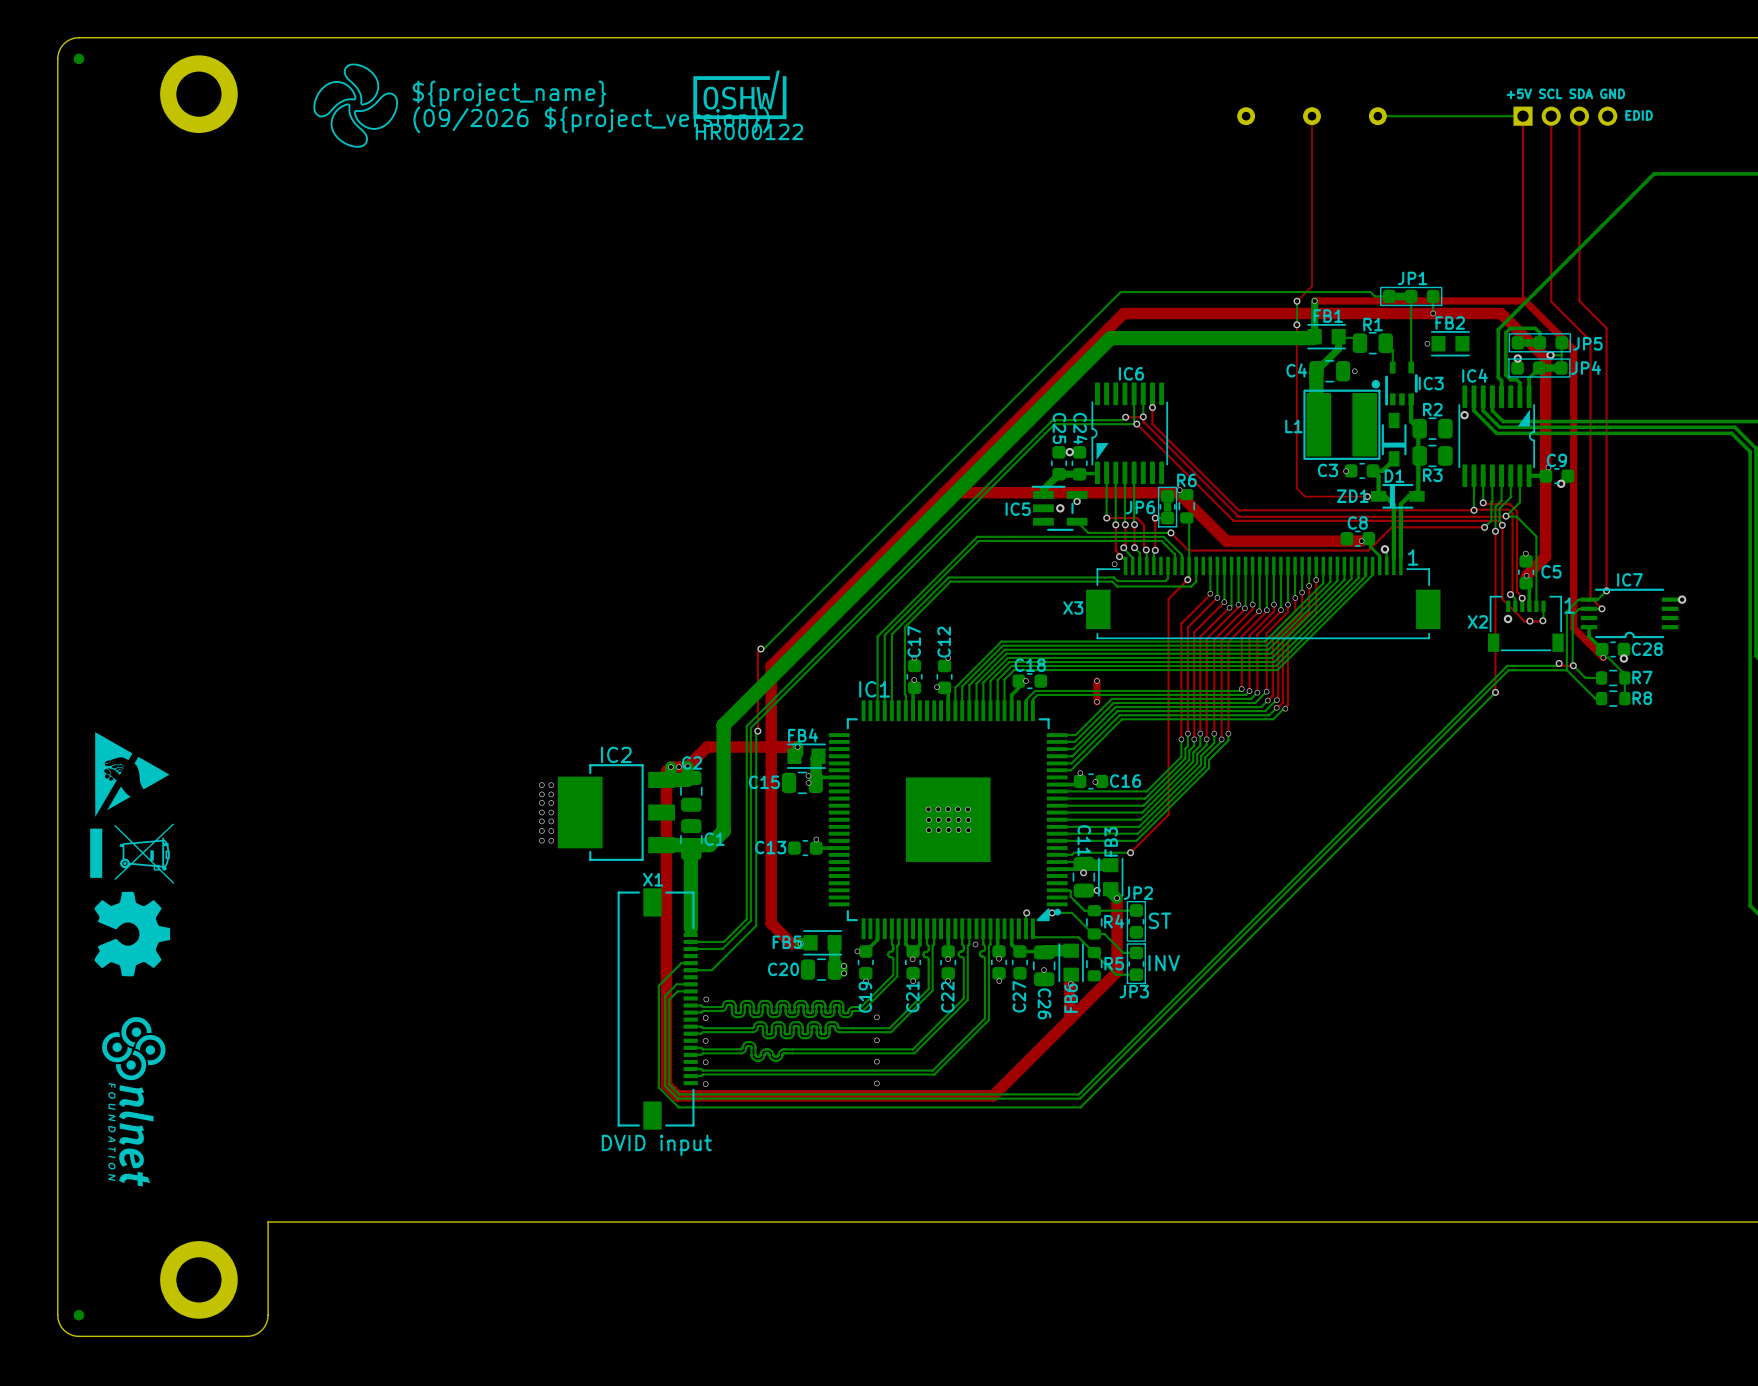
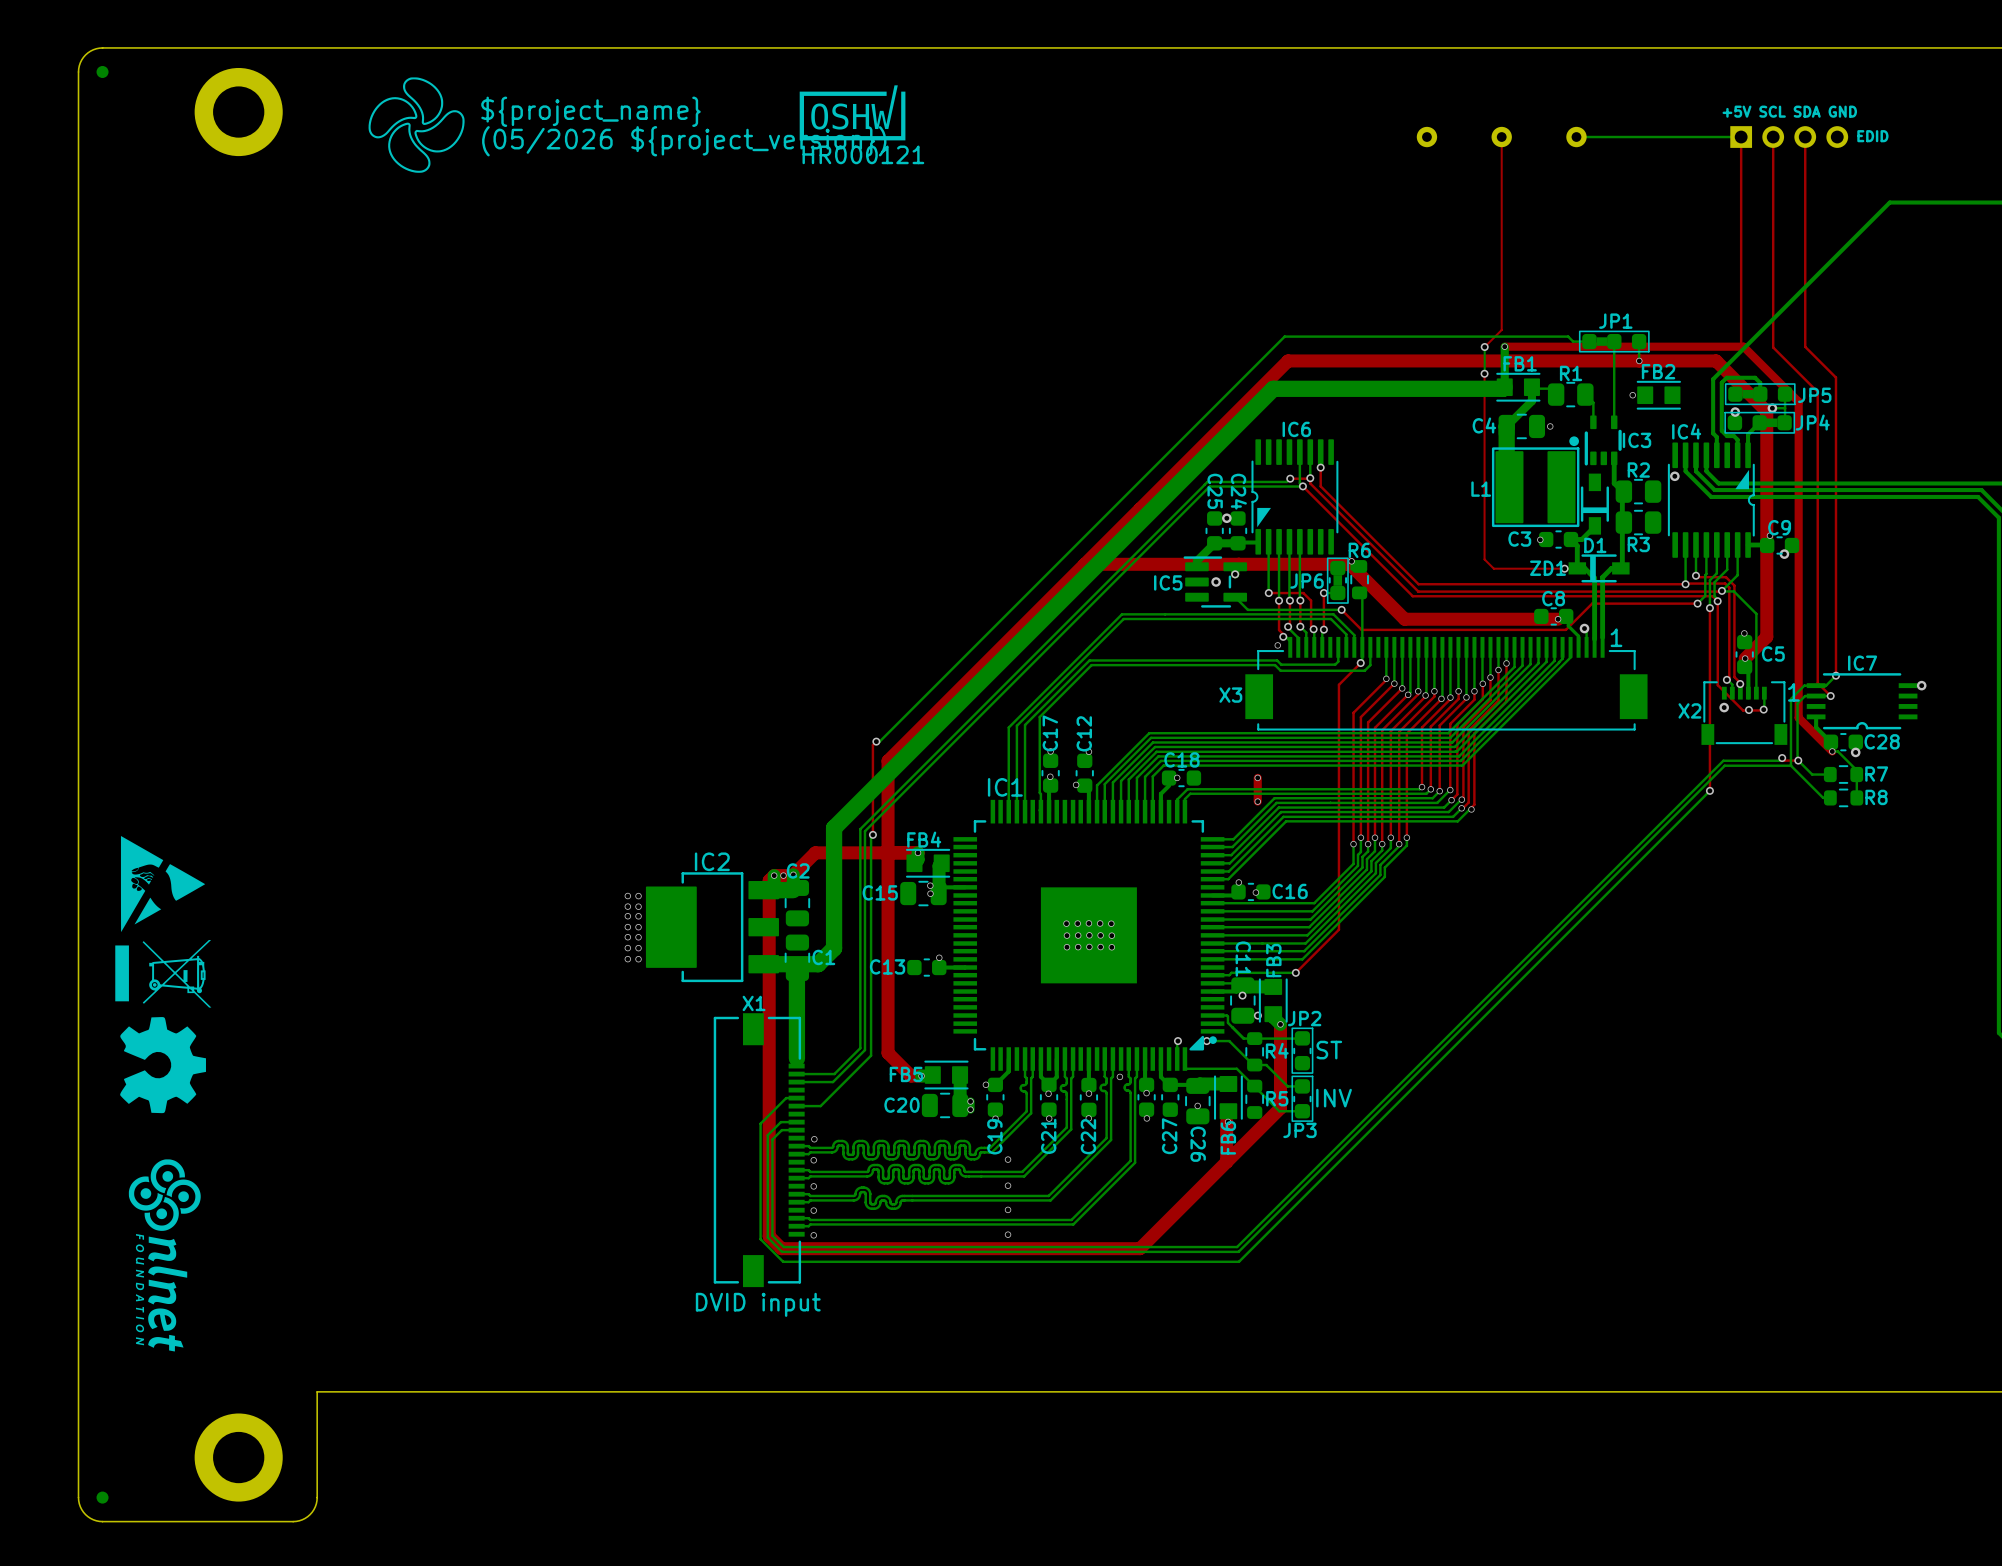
text: (09/2026 ${project_version}) (591, 119) -> (05/2026 ${project_version}) (684, 141)
text: HR000122 (749, 131) -> HR000121 (863, 154)

